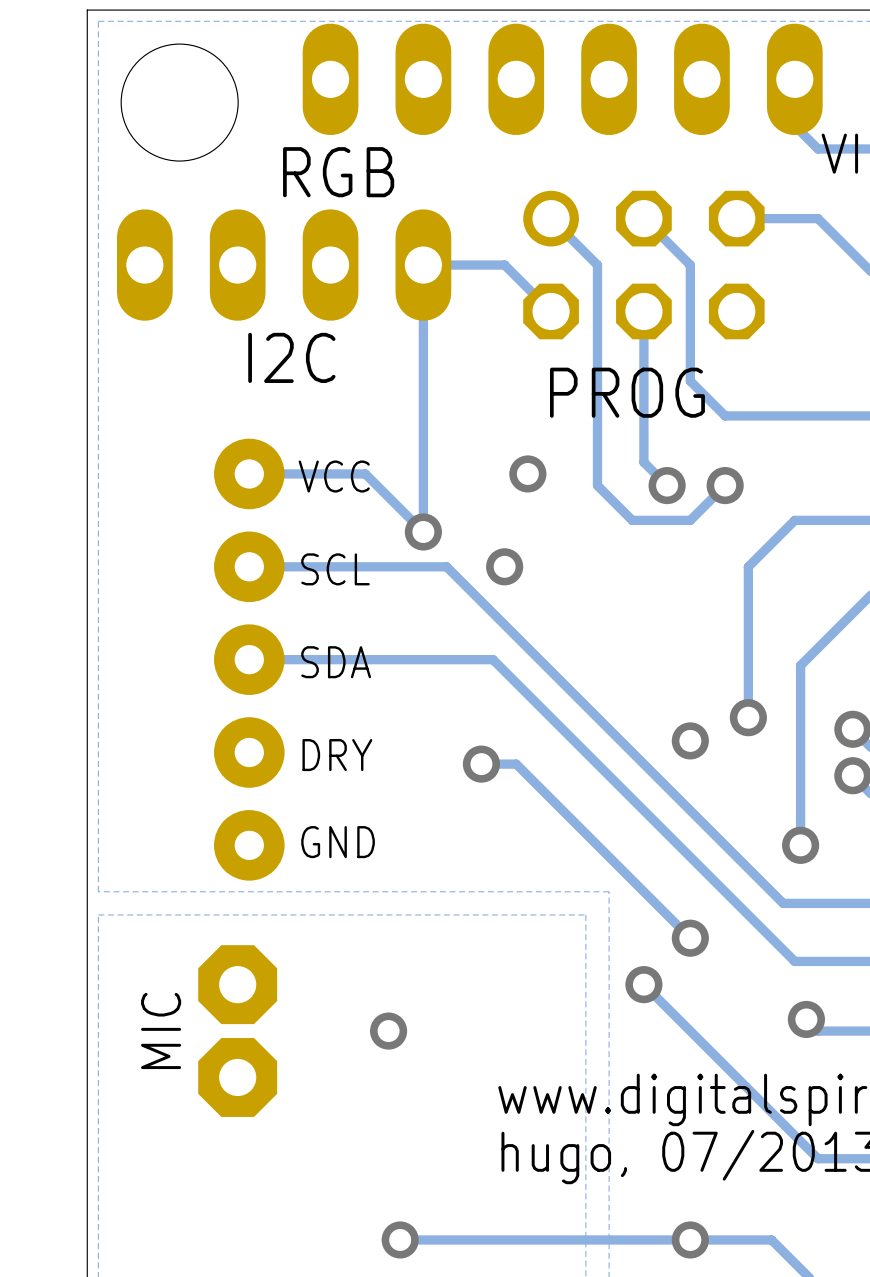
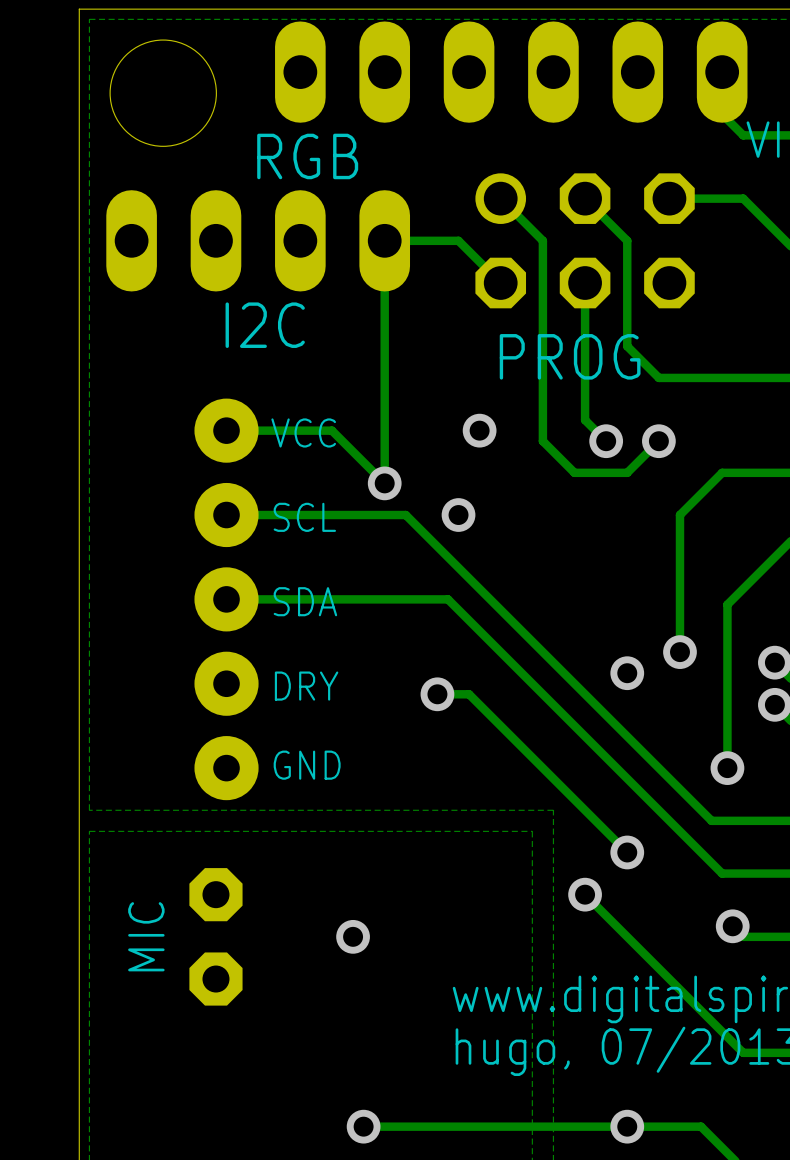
part footprint: [198, 945, 278, 1025] -> [189, 868, 243, 922]
part footprint: [198, 1038, 278, 1117] -> [189, 952, 243, 1006]

